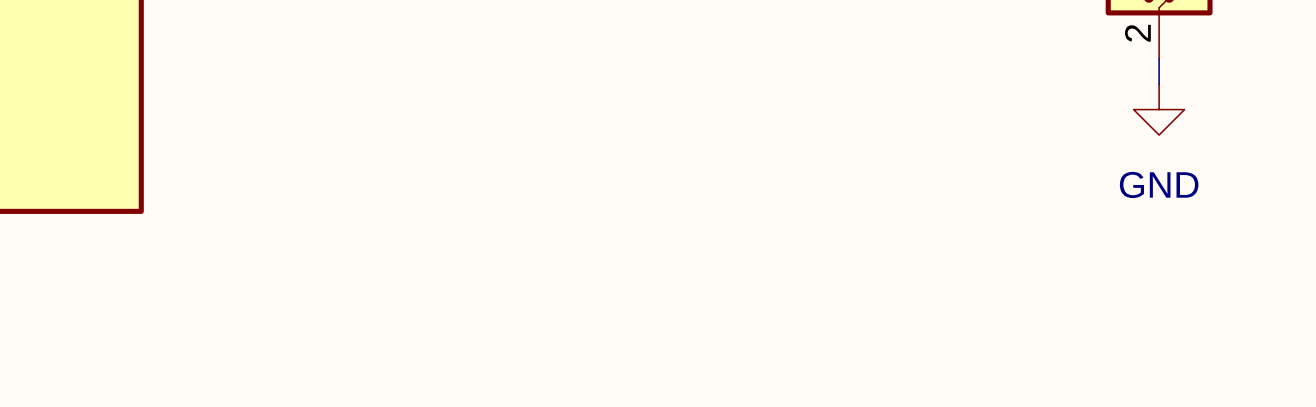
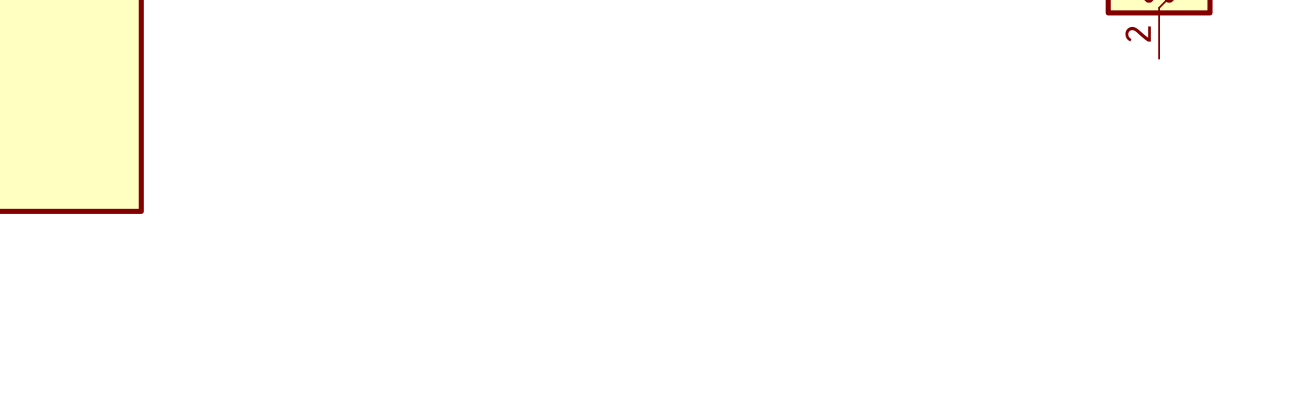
wire: (1159, 58) (1159, 84) -> none
power symbol: GND (1159, 109) -> none

